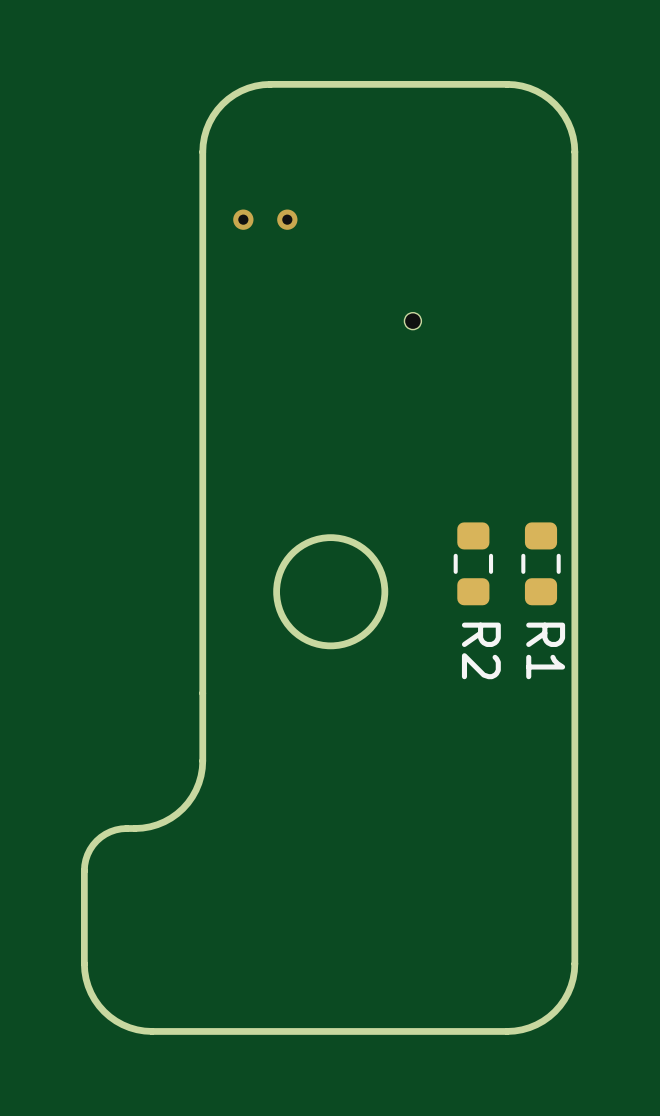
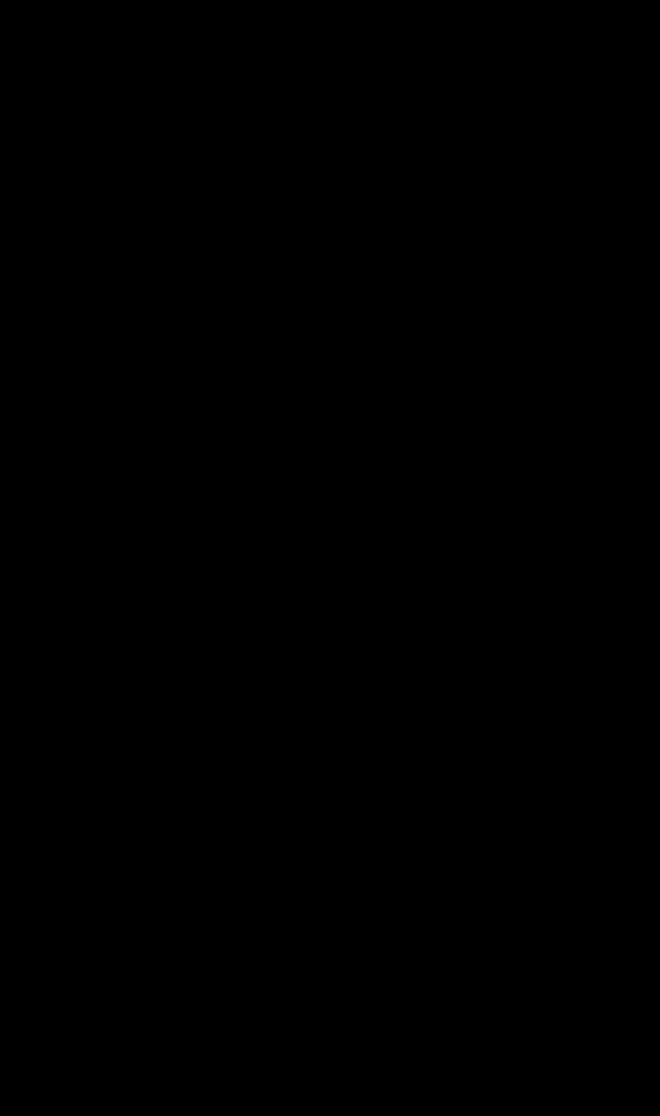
board edge: (507, 84) (262, 84) (241, 91) (228, 99) (217, 109) (206, 129) (202, 152) (202, 768) (196, 790) (187, 803) (177, 813) (164, 821) (150, 826) (121, 828) (105, 834) (90, 849) (84, 865) (84, 963) (86, 978) (91, 993) (104, 1011) (116, 1021) (129, 1027) (152, 1031) (514, 1031) (536, 1024) (549, 1016) (560, 1005) (571, 986) (574, 963) (574, 144) (571, 129) (564, 116) (549, 99) (529, 88) (507, 84) -> none
via: (243, 219) -> none
via: (287, 219) -> none
part: (412, 321) -> none
round board edge: [273, 534, 389, 650] -> none
R2: (473, 563) -> none
R1: (541, 563) -> none

